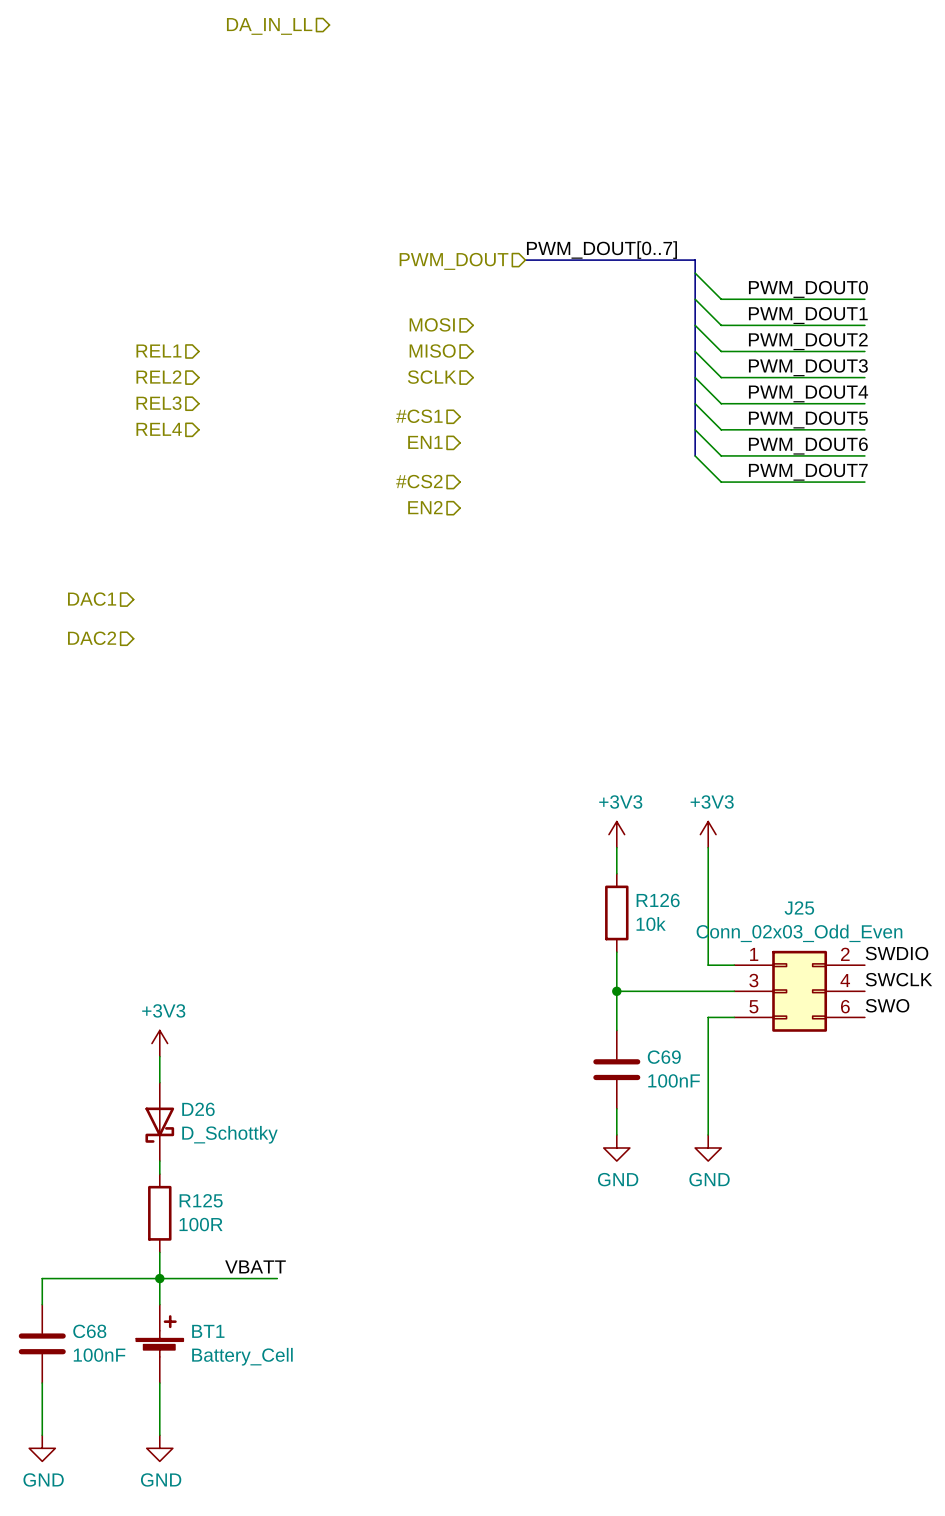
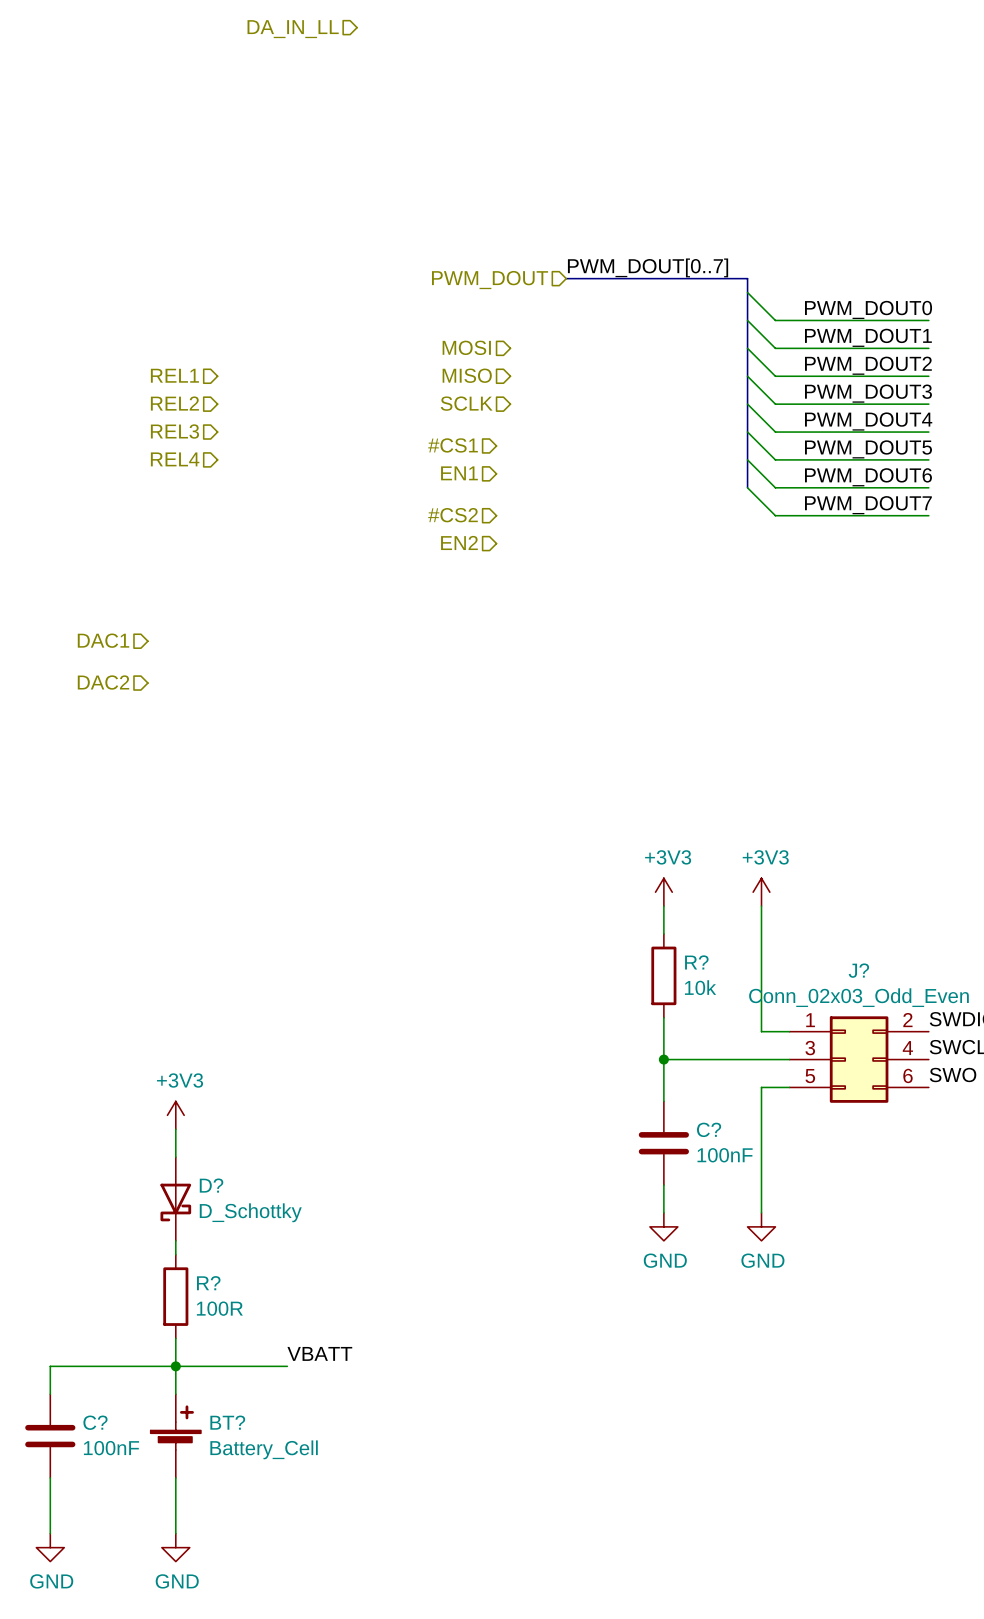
R126 name: R126 (658, 900) -> R? (696, 962)
J25 name: J25 (799, 908) -> J? (858, 970)
C69 name: C69 (664, 1057) -> C? (709, 1129)
D26 name: D26 (198, 1109) -> D? (211, 1185)
R125 name: R125 (201, 1200) -> R? (208, 1283)
label position: VBATT (255, 1266) -> VBATT (319, 1353)
wire: (264, 1278) (277, 1278) -> none
C68 name: C68 (89, 1331) -> C? (95, 1422)
BT1 name: BT1 (208, 1331) -> BT? (227, 1422)

